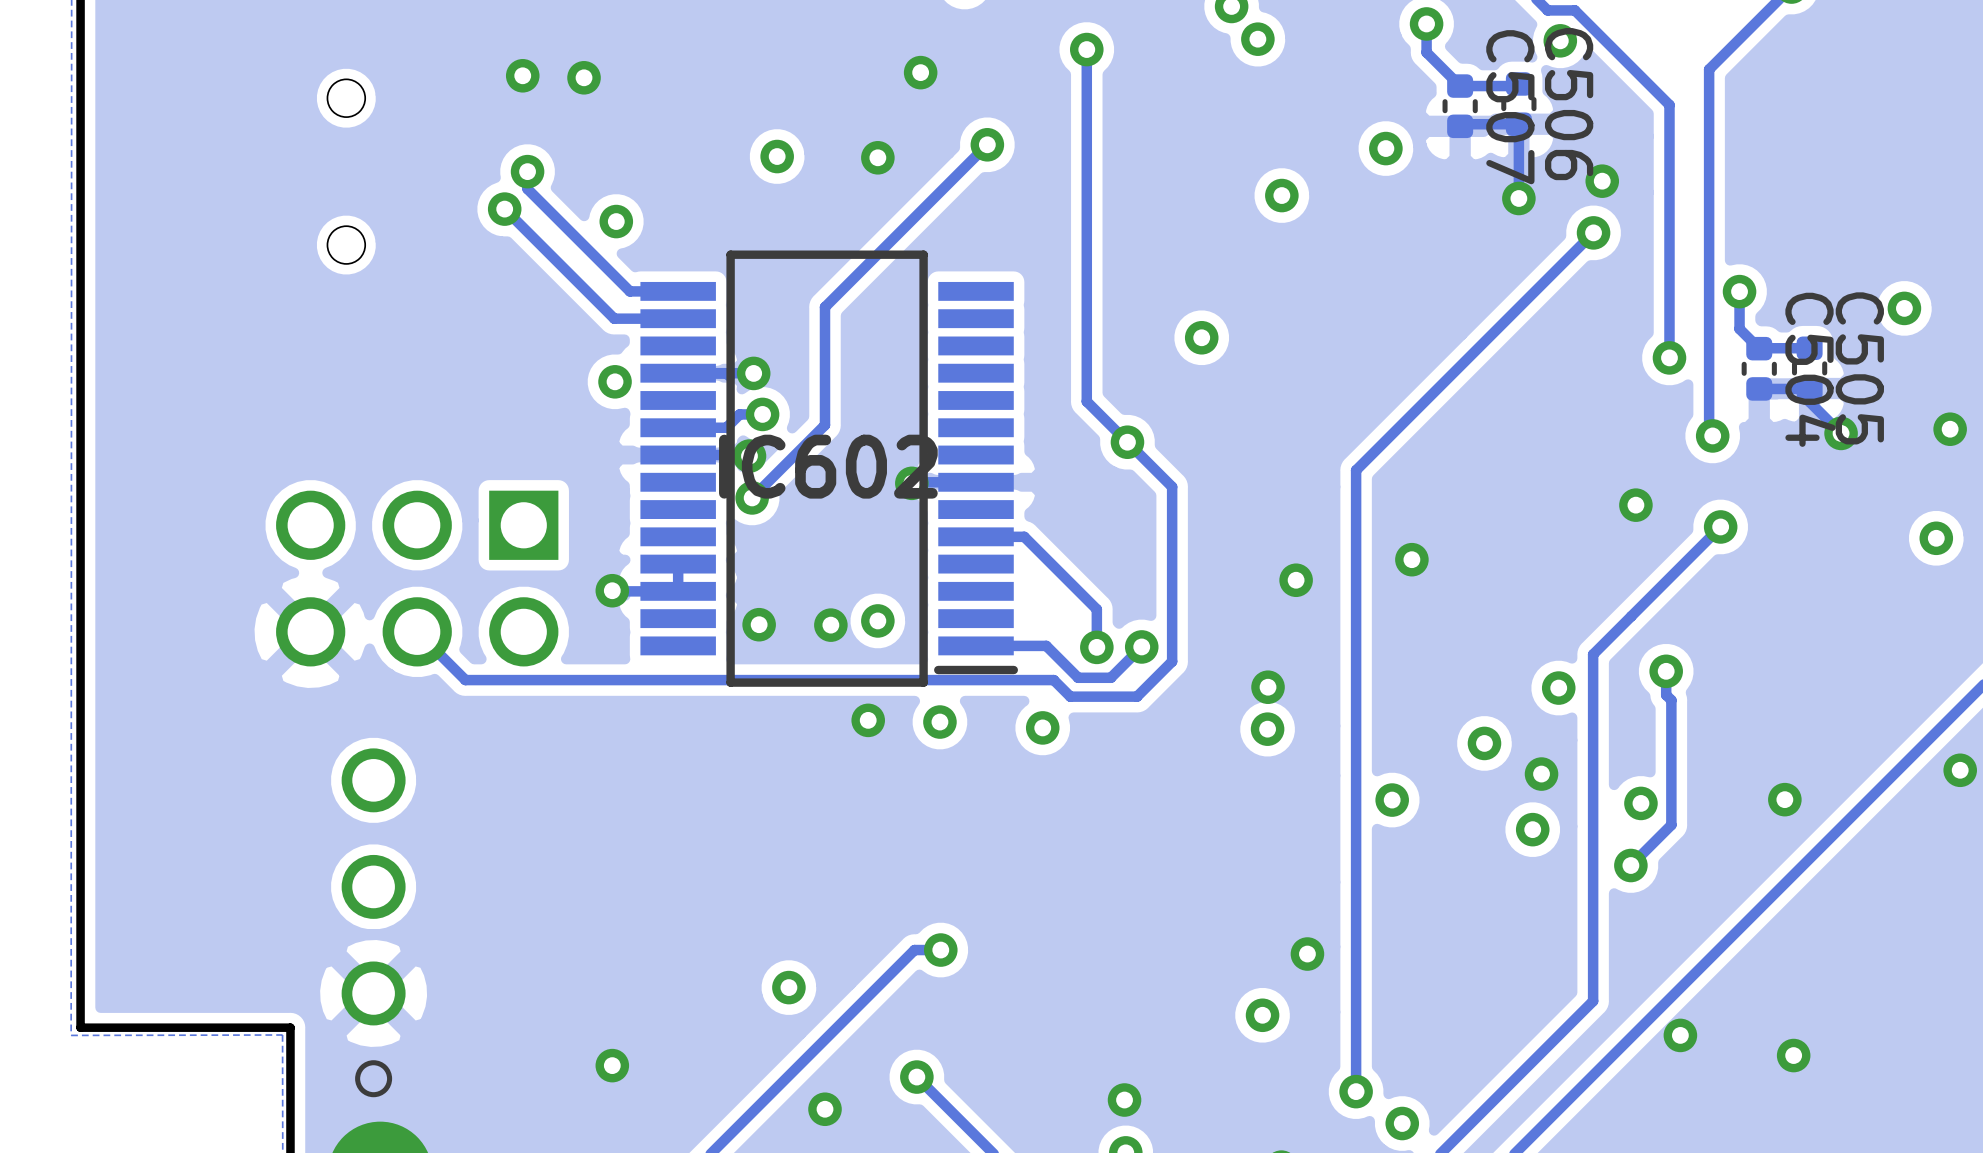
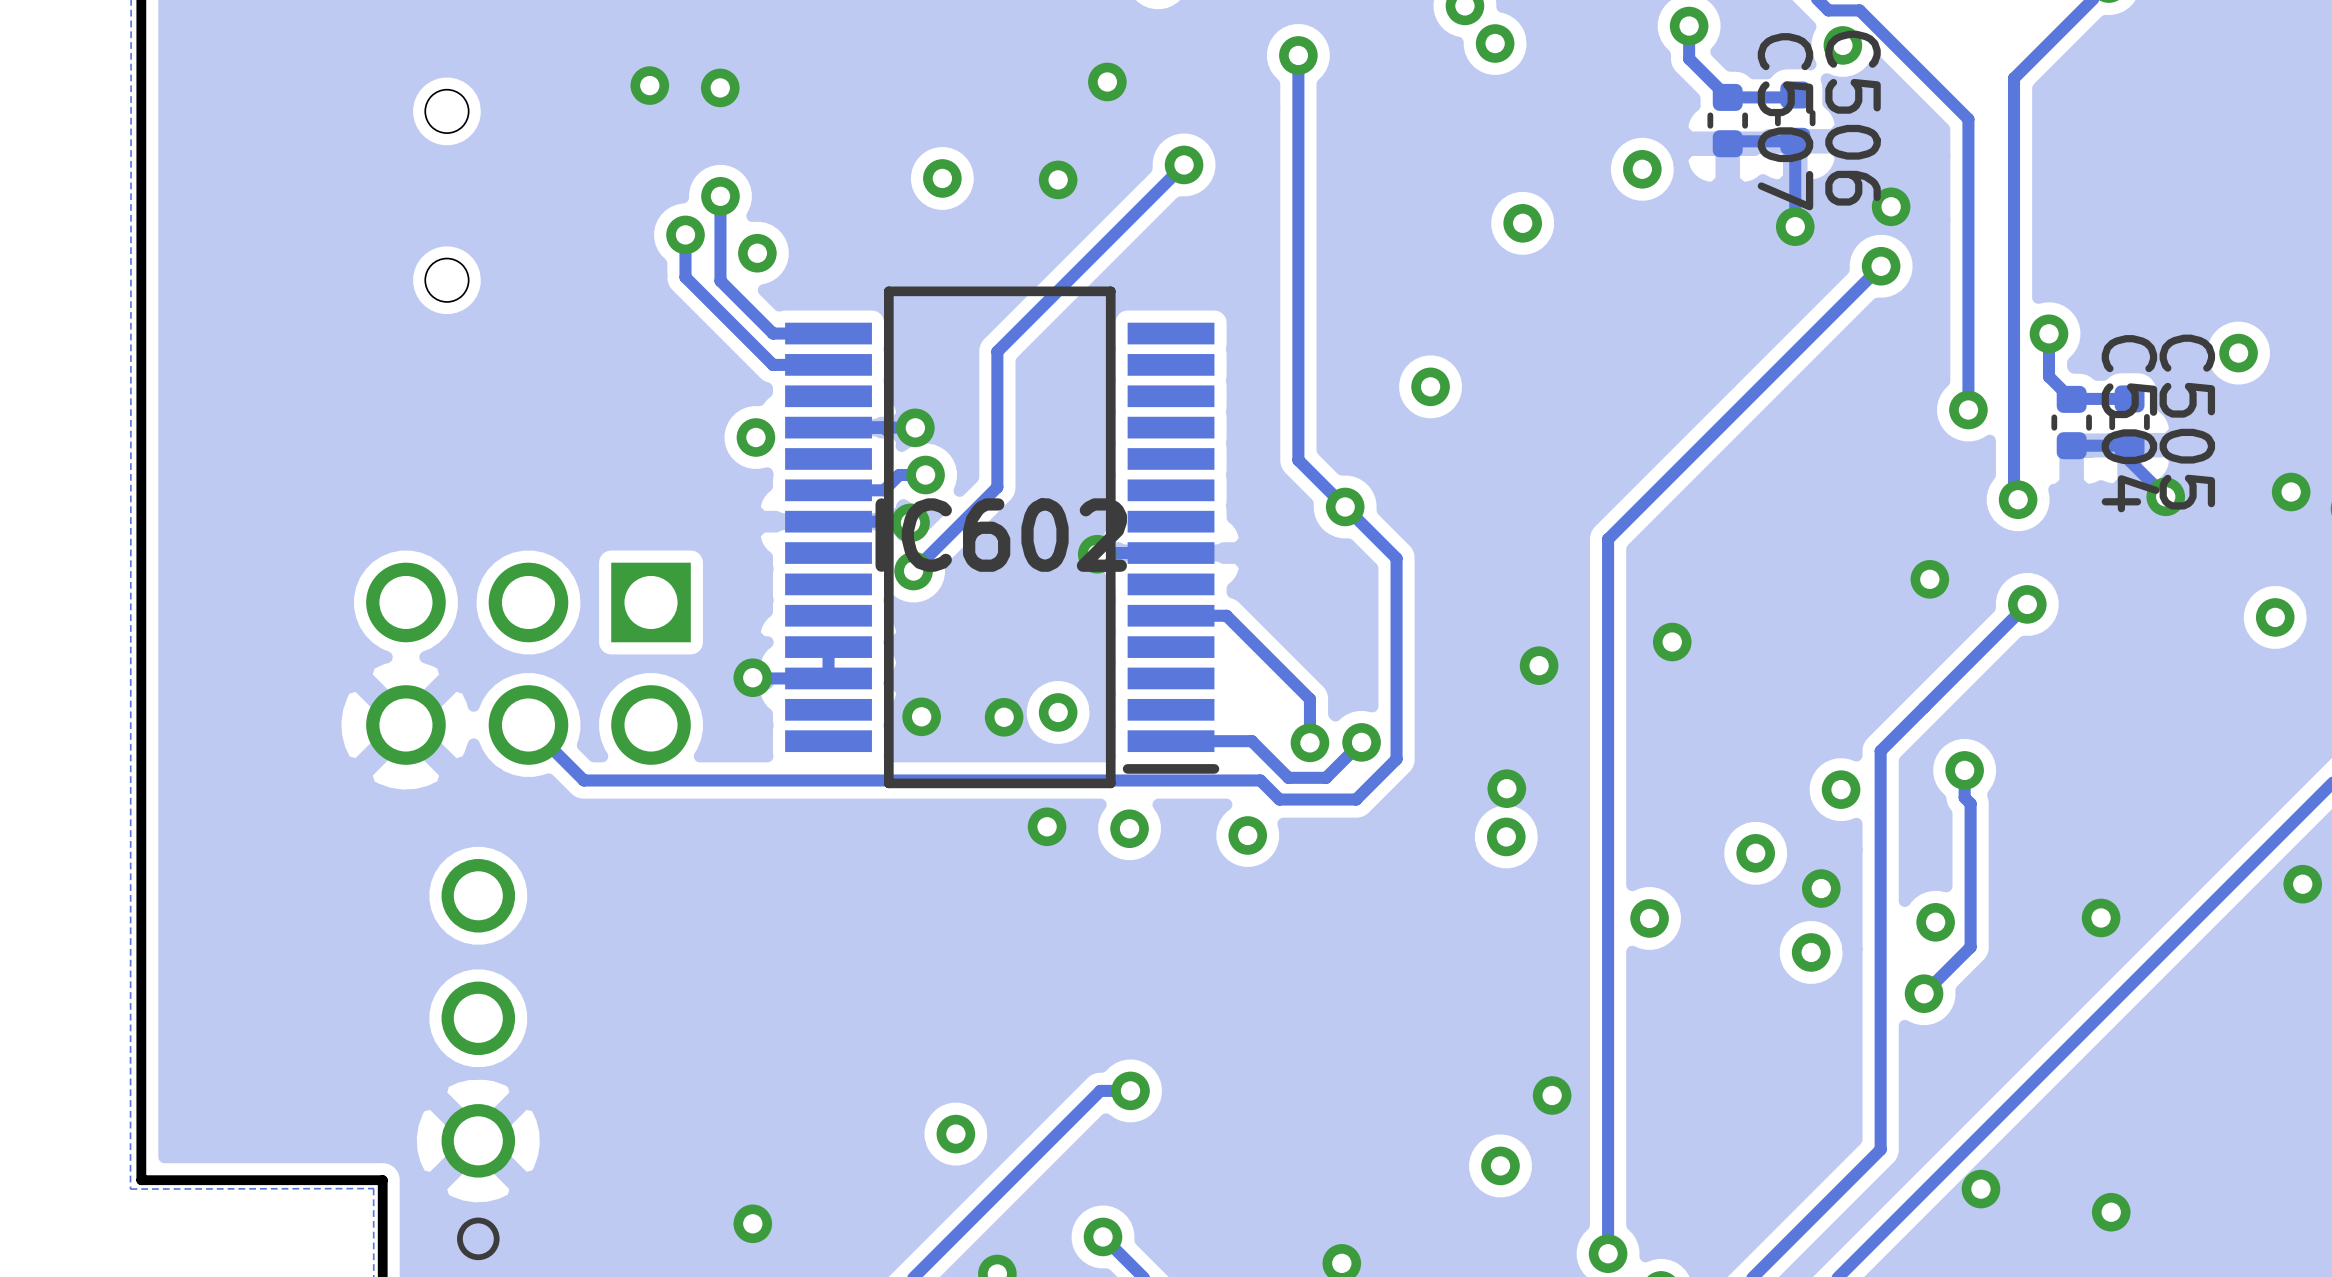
track: (527, 171) (527, 189) (584, 245) -> (720, 196) (720, 280)
via: (527, 171) -> none
via: none -> (720, 196)
via: none -> (685, 234)
track: (504, 209) (614, 318) (629, 318) -> (685, 234) (685, 277) (773, 364)
via: (504, 209) -> none

